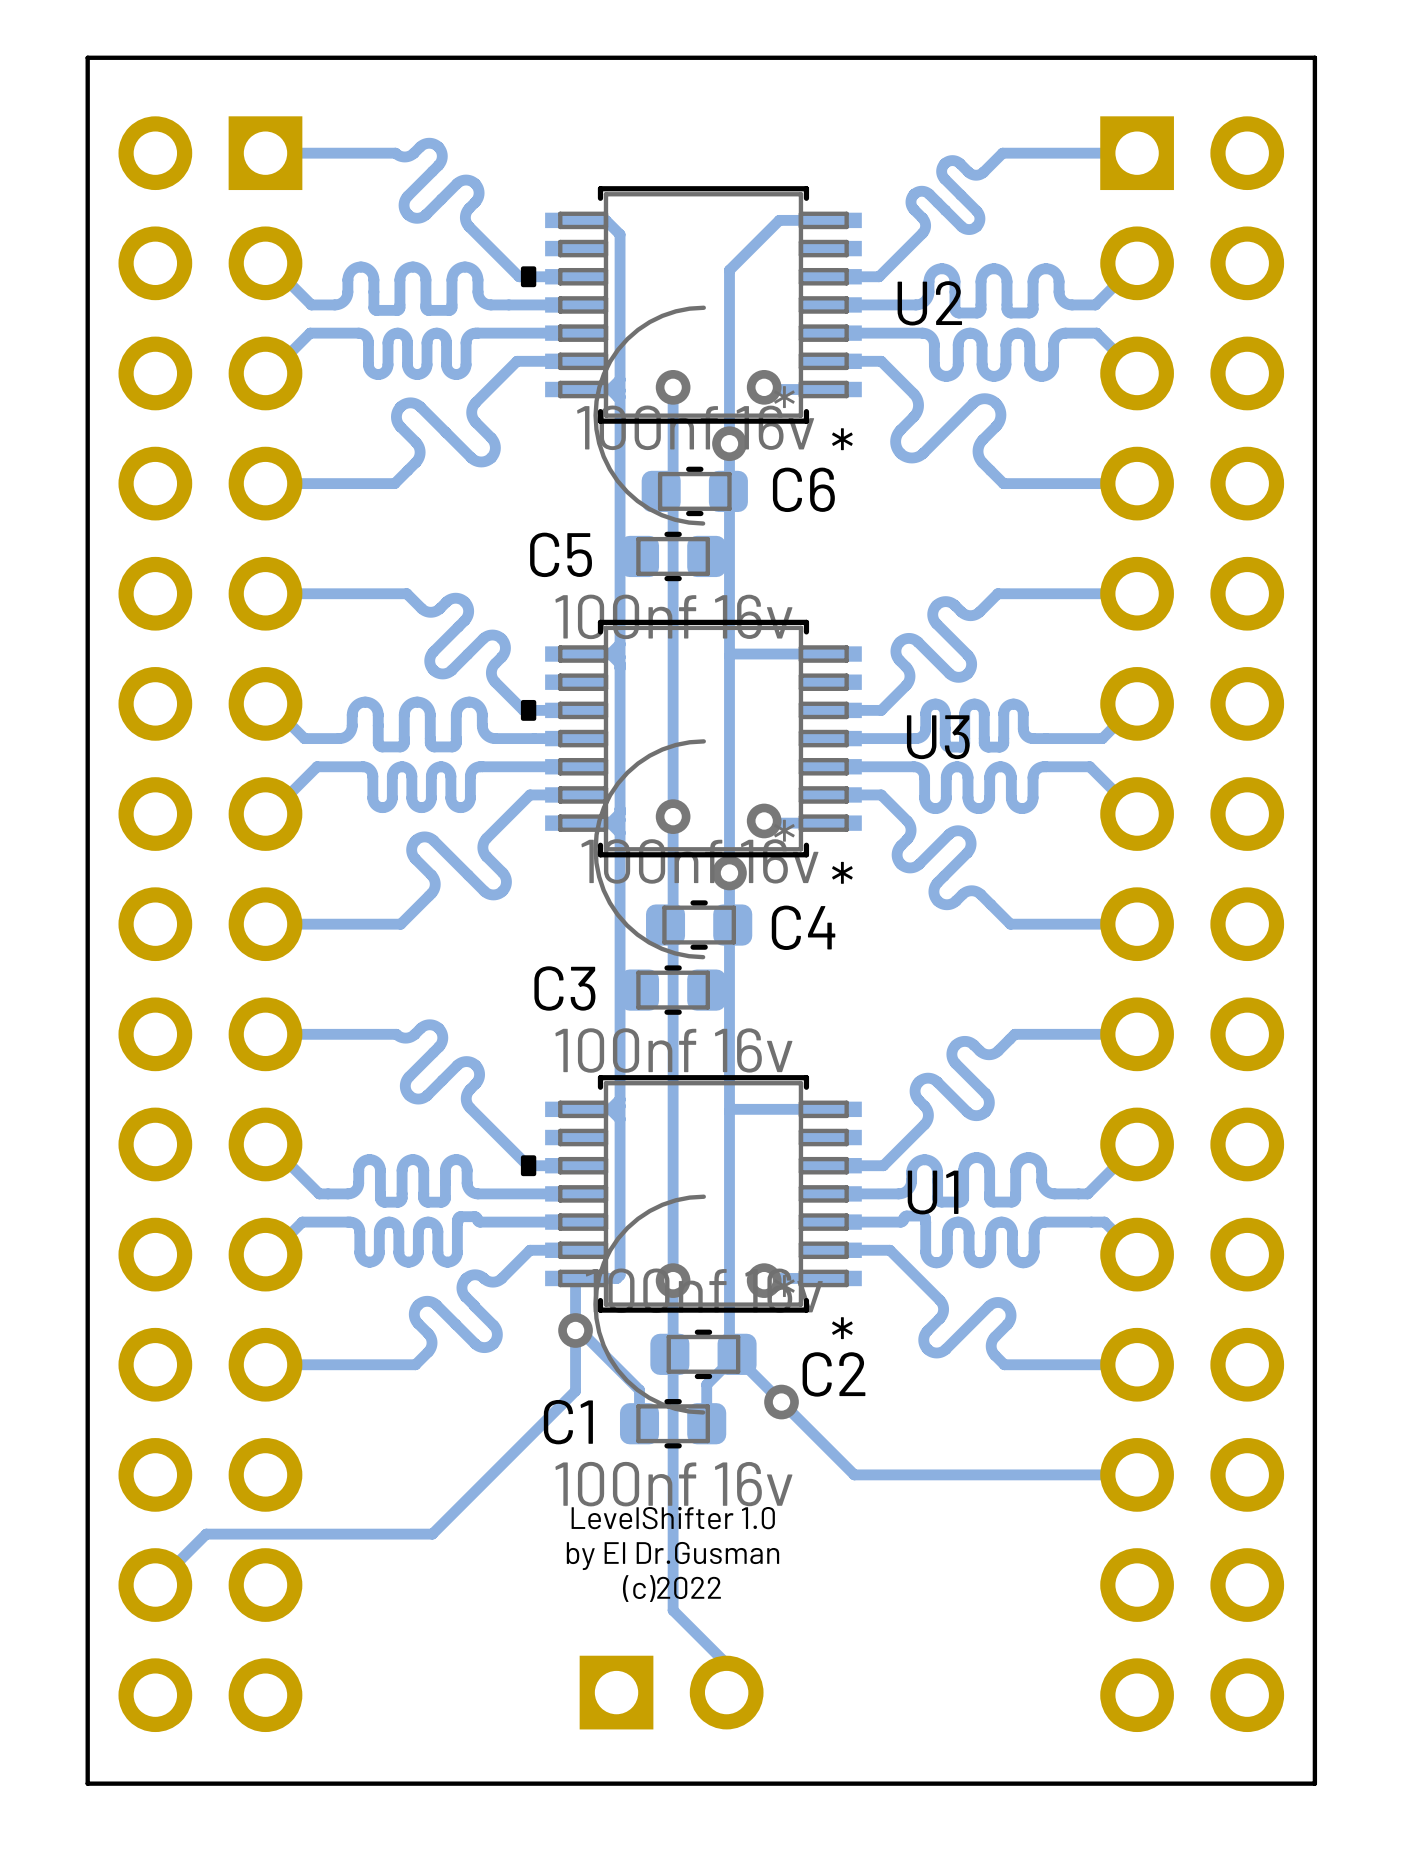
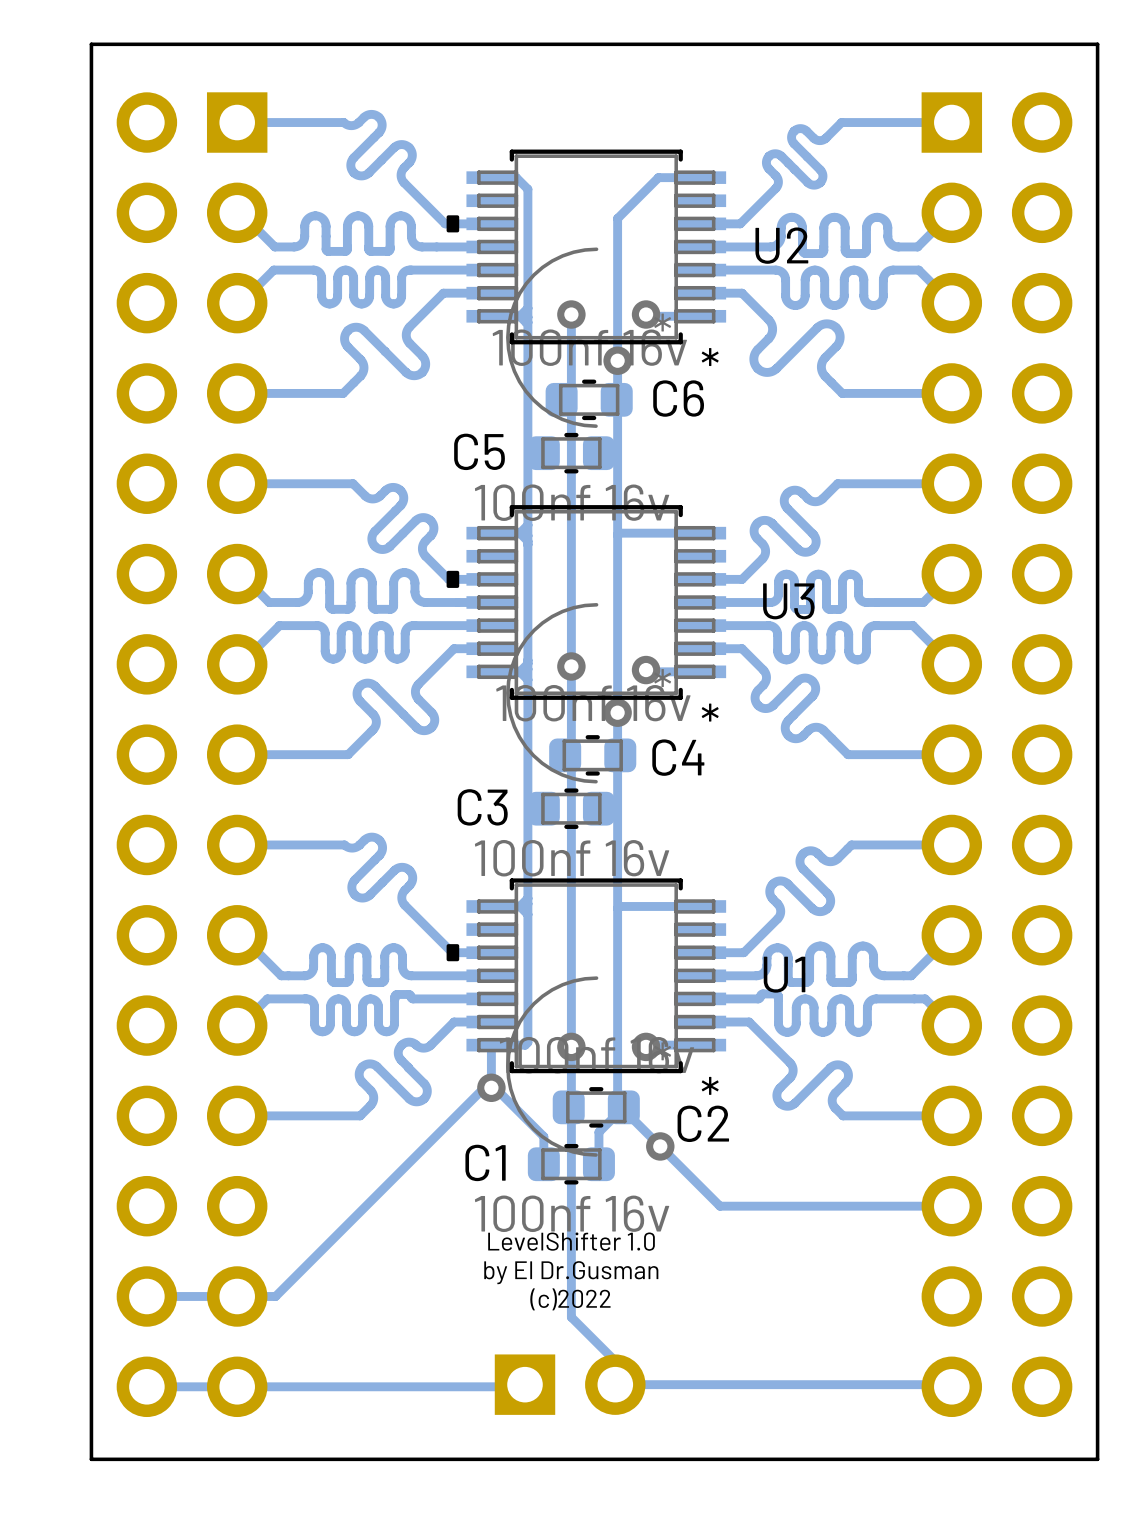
track: (575, 1330) (575, 1390) (432, 1534) (206, 1534) (155, 1585) -> (491, 1087) (484, 1087) (275, 1296) (150, 1296)
track: none -> (525, 1384) (522, 1386) (146, 1386)
track: none -> (615, 1384) (949, 1384) (951, 1386)

